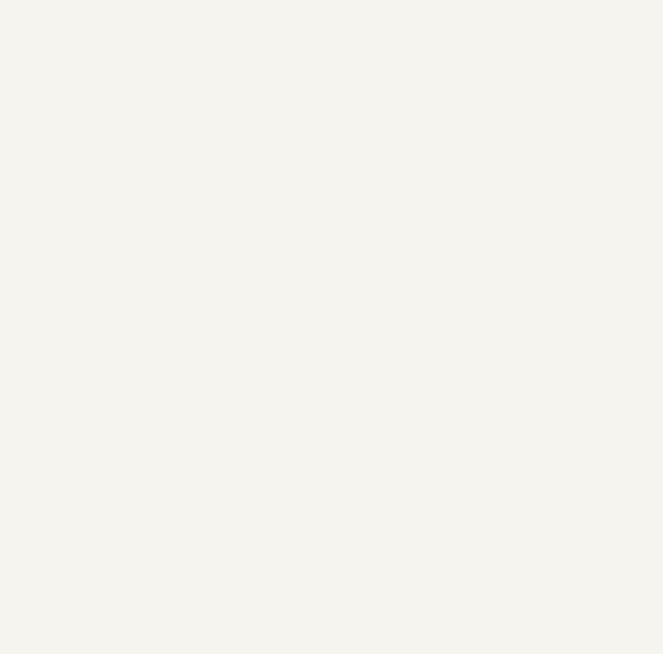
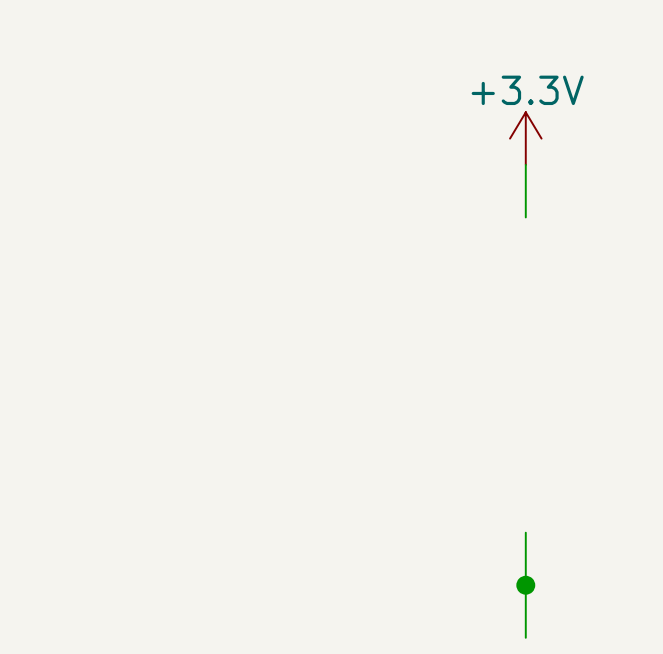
power symbol: none -> +3.3V (525, 138)
wire: none -> (525, 164) (525, 217)
wire: none -> (525, 532) (525, 637)
junction: none -> (525, 585)

